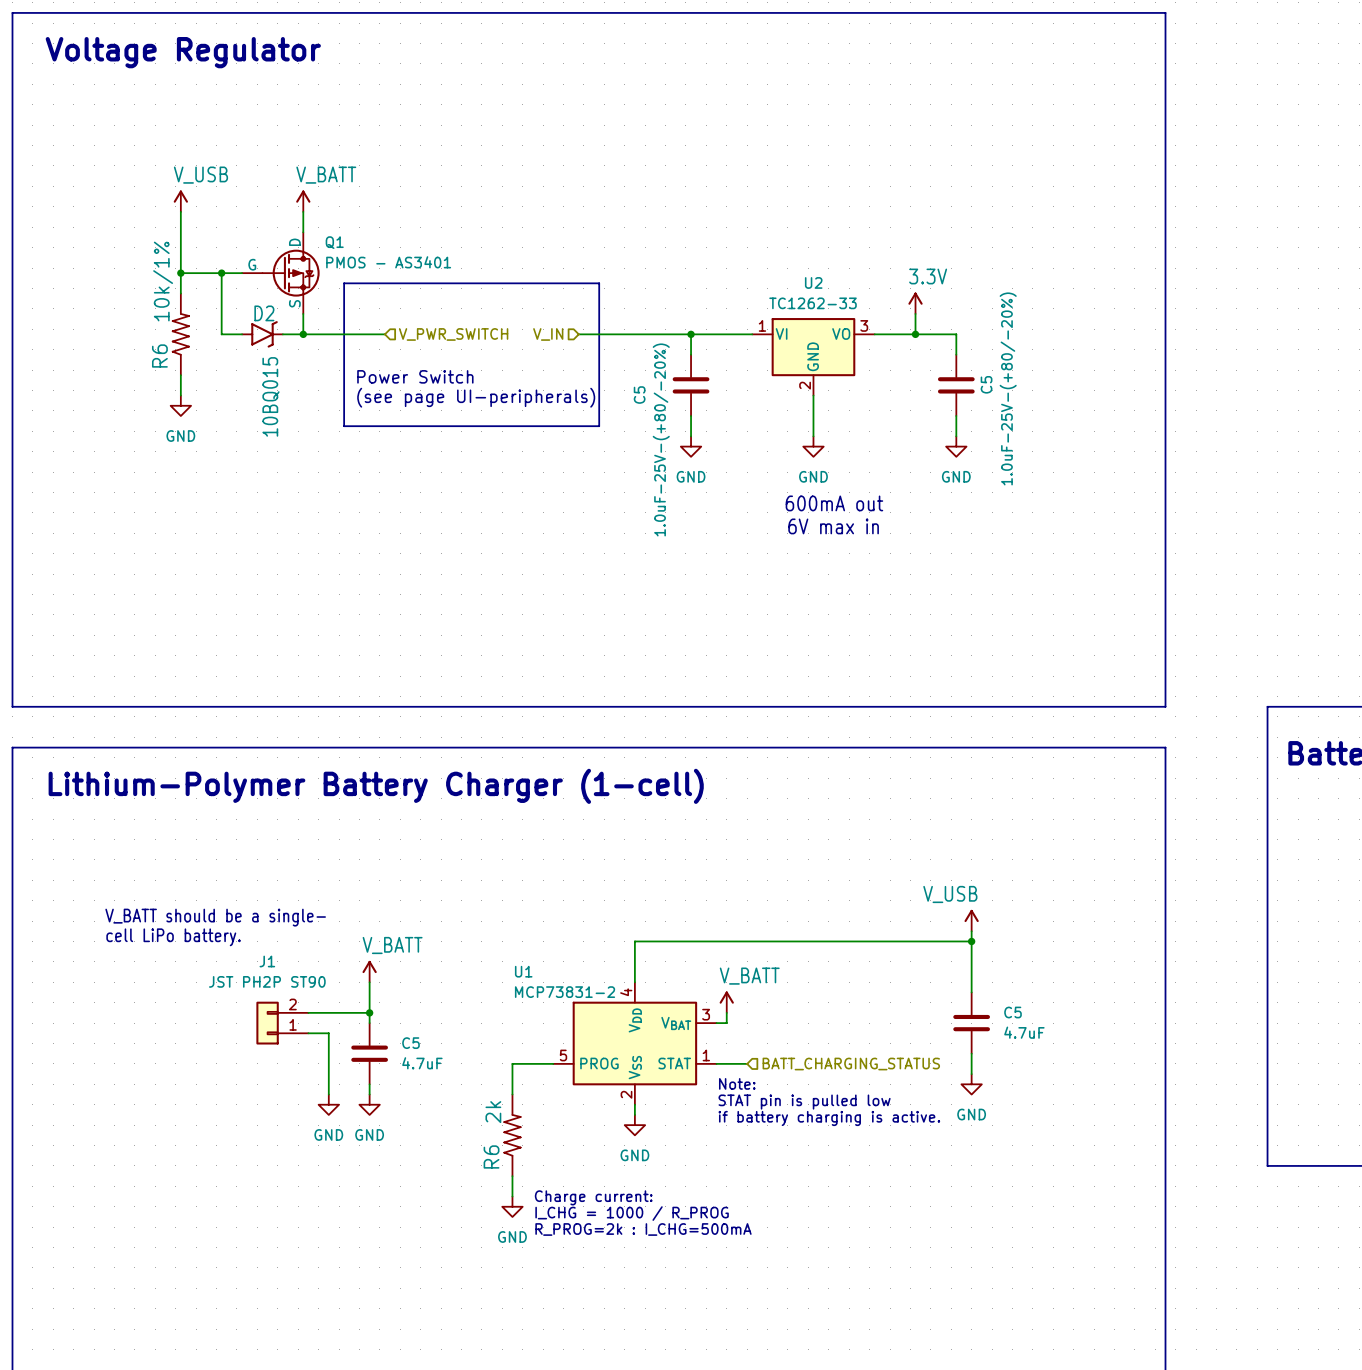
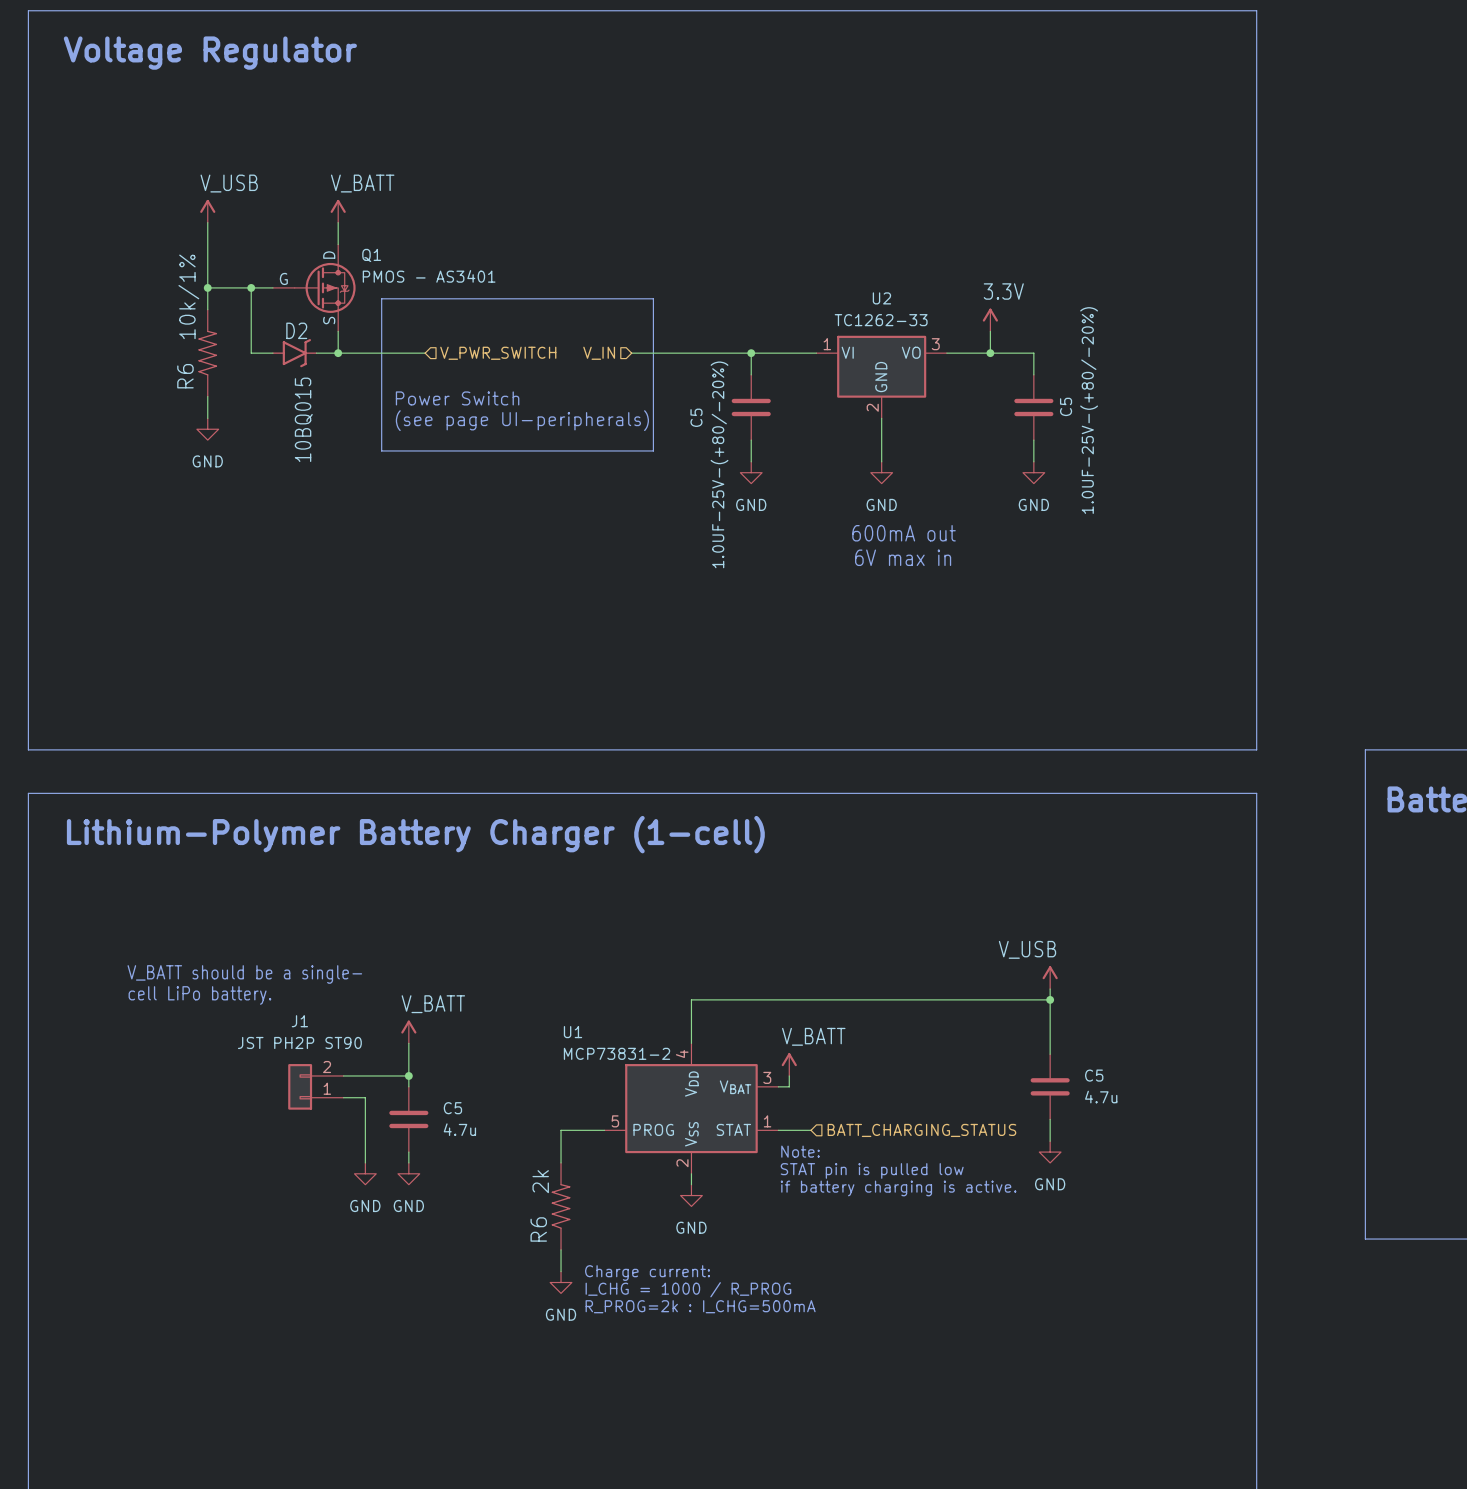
C5 value: 1.0uF-25V-(+80/-20%) (1008, 388) -> 1.0UF-25V-(+80/-20%) (1089, 410)
C5 value: 1.0uF-25V-(+80/-20%) (661, 439) -> 1.0UF-25V-(+80/-20%) (719, 464)
C5 value: 4.7uF (1024, 1032) -> 4.7u (1101, 1097)
C5 value: 4.7uF (422, 1063) -> 4.7u (459, 1129)

